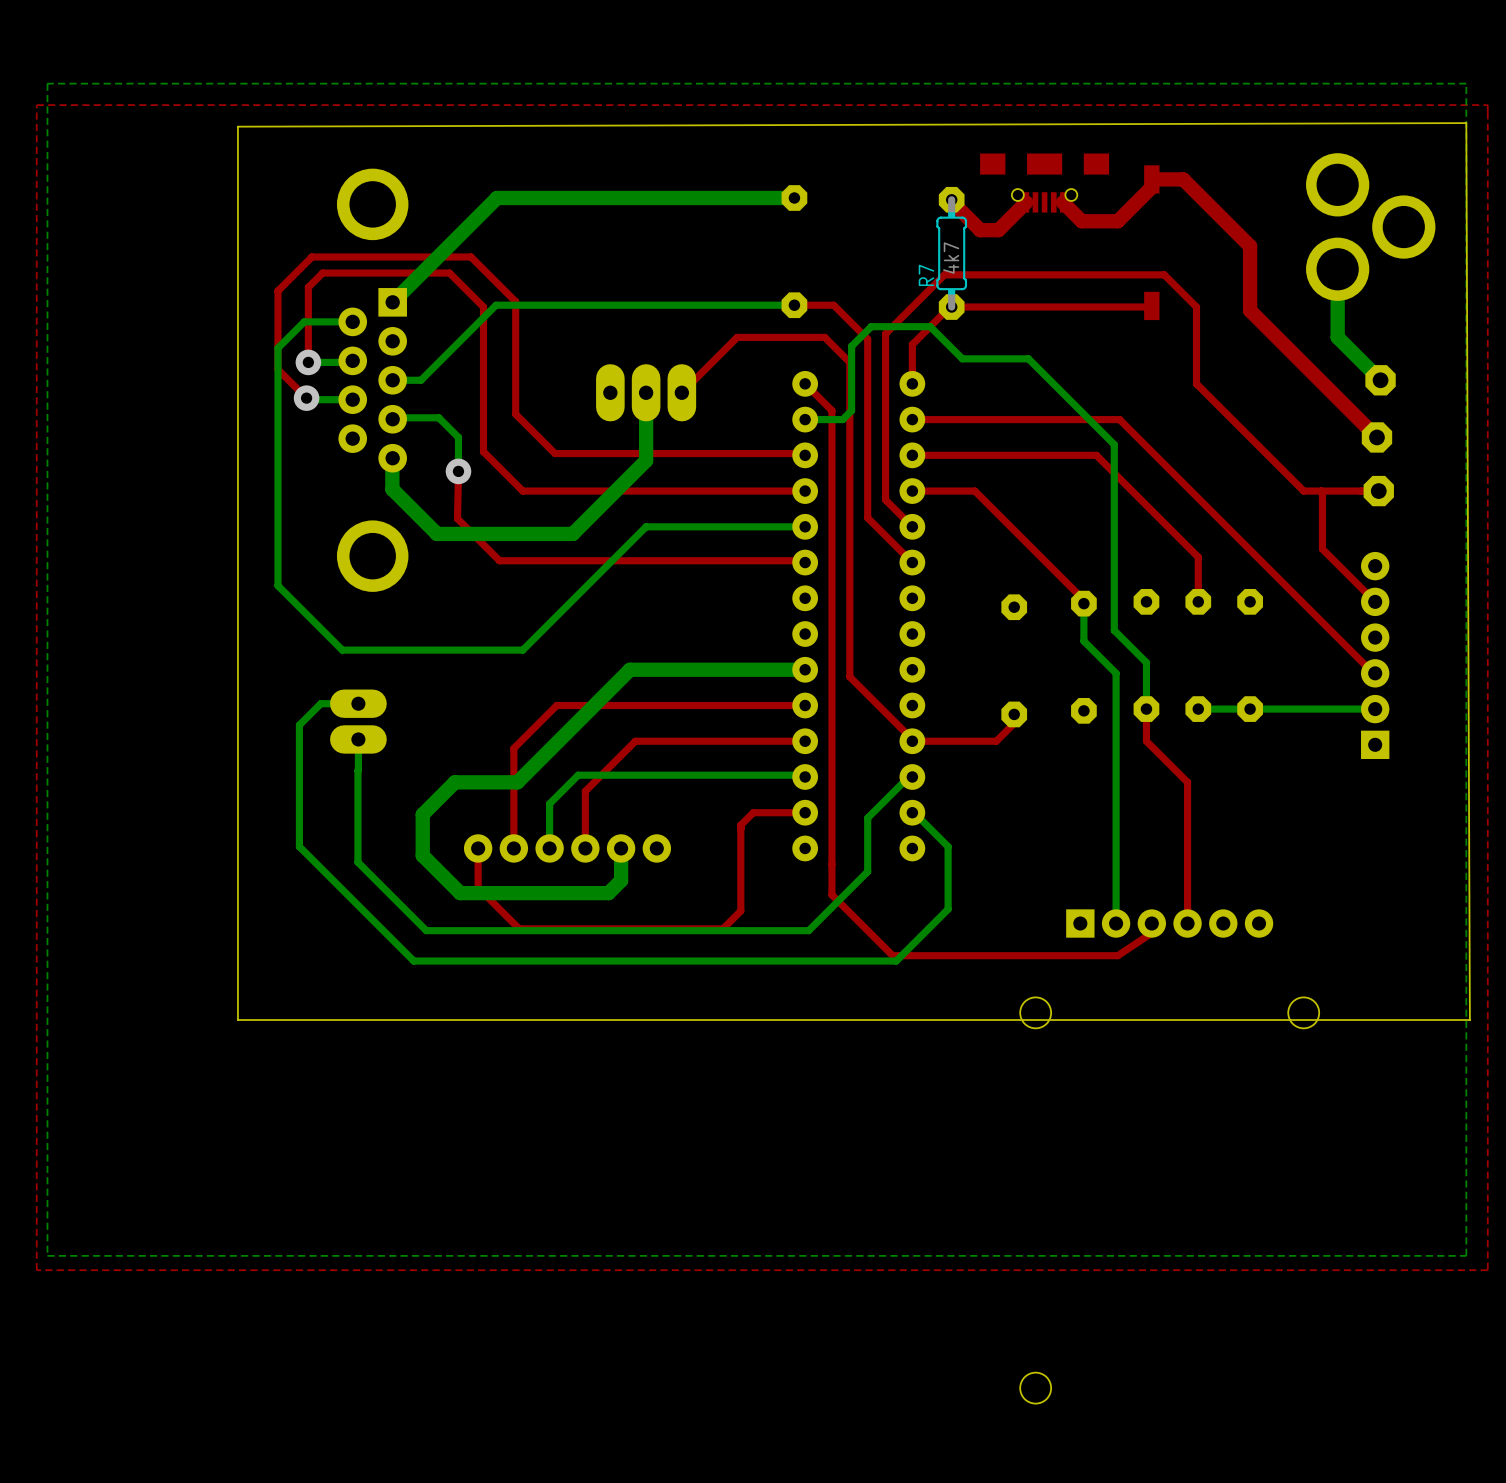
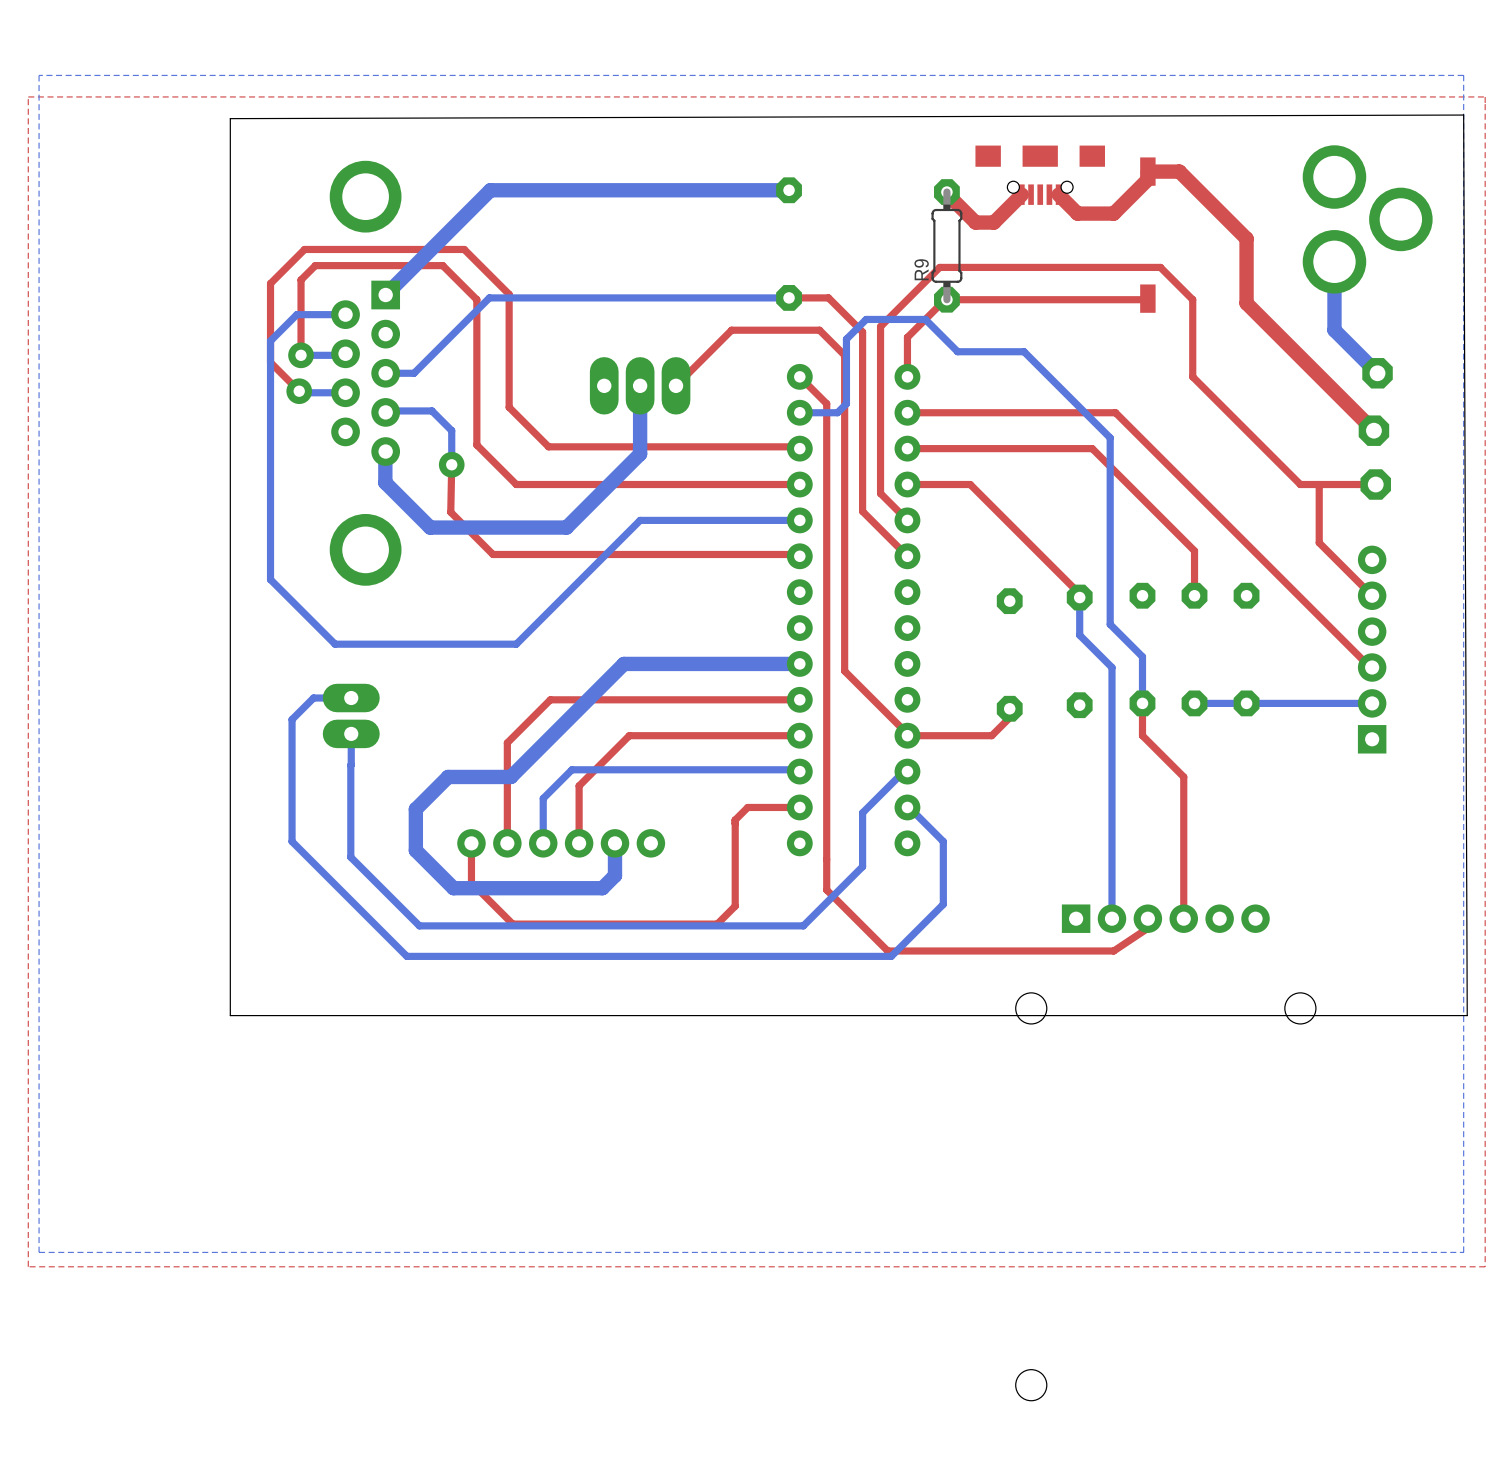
R7 value: 4k7 (951, 258) -> none
R7 name: R7 (926, 275) -> R9 (921, 269)

